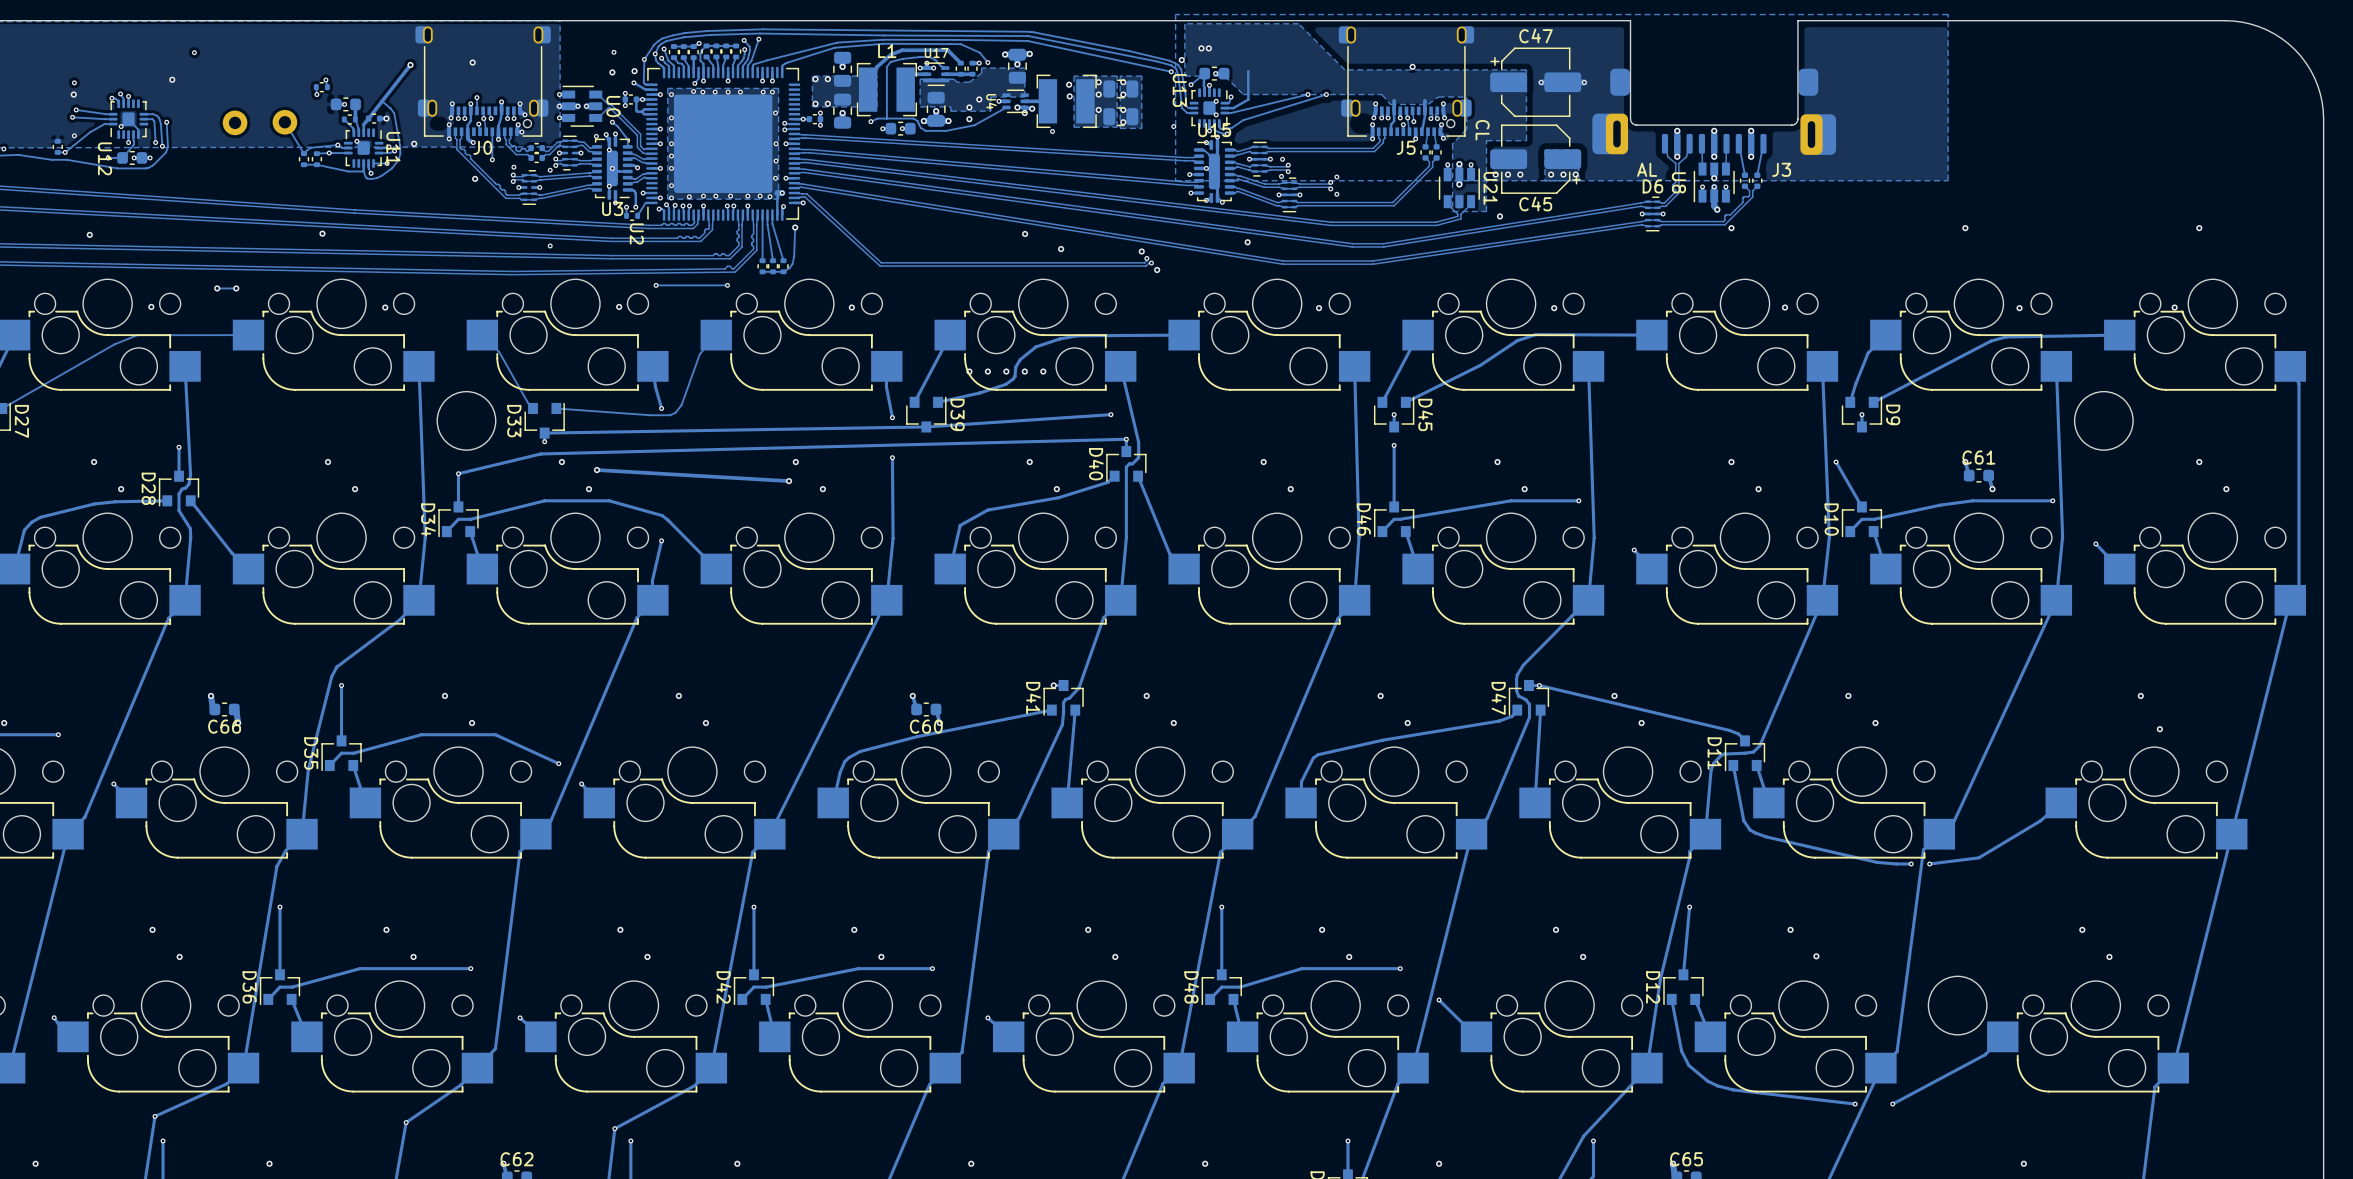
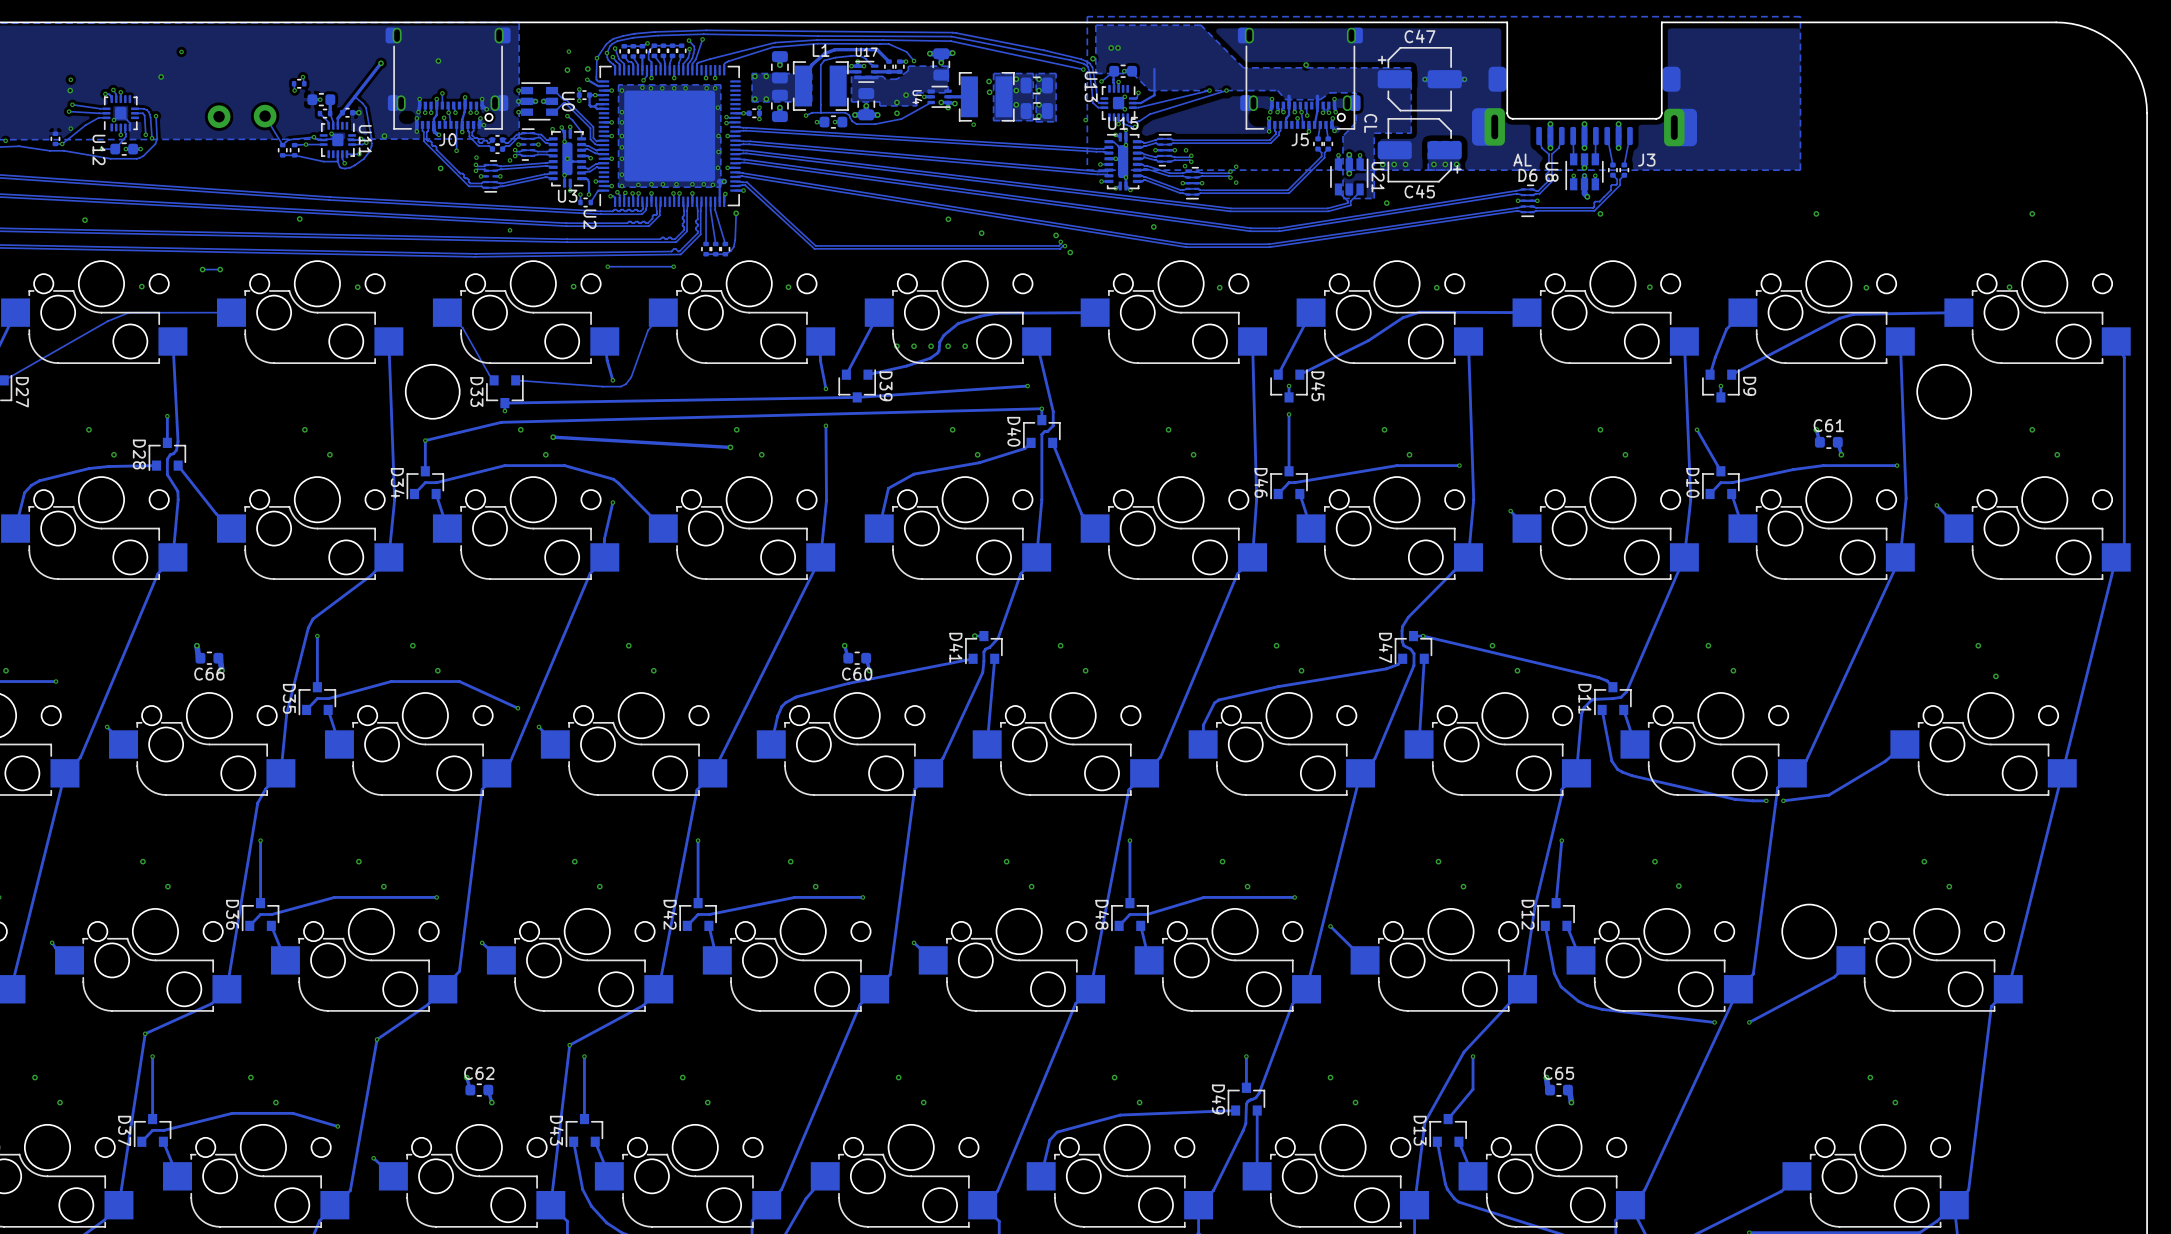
via: none -> (1125, 145)
via: none -> (1125, 177)

